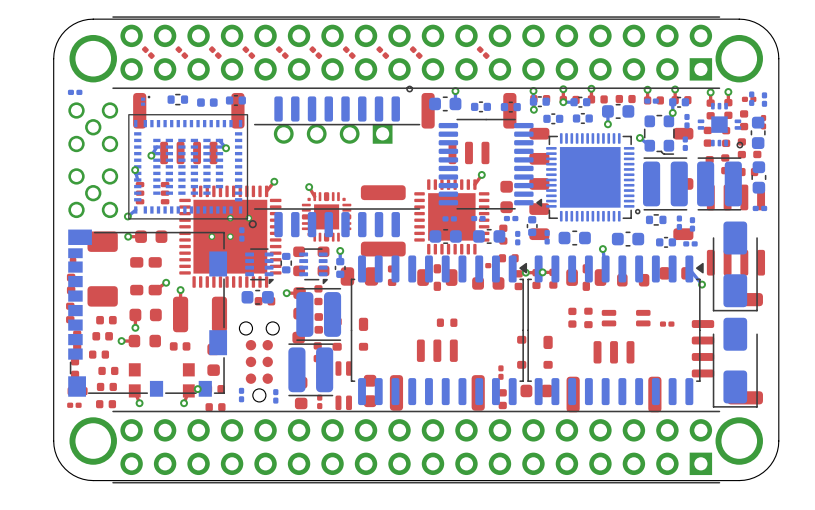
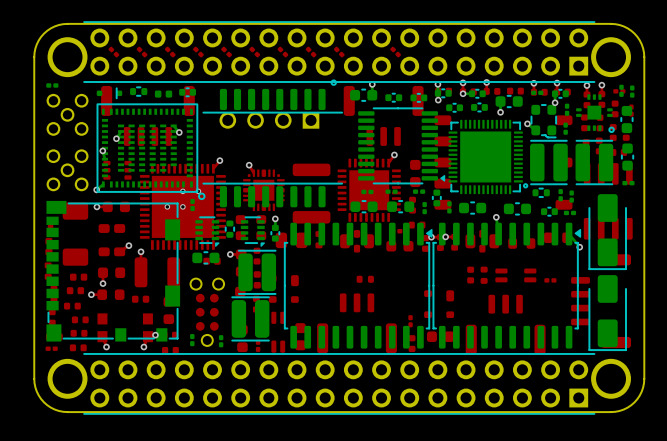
part footprint: [140, 95, 151, 106] -> [96, 87, 123, 99]

